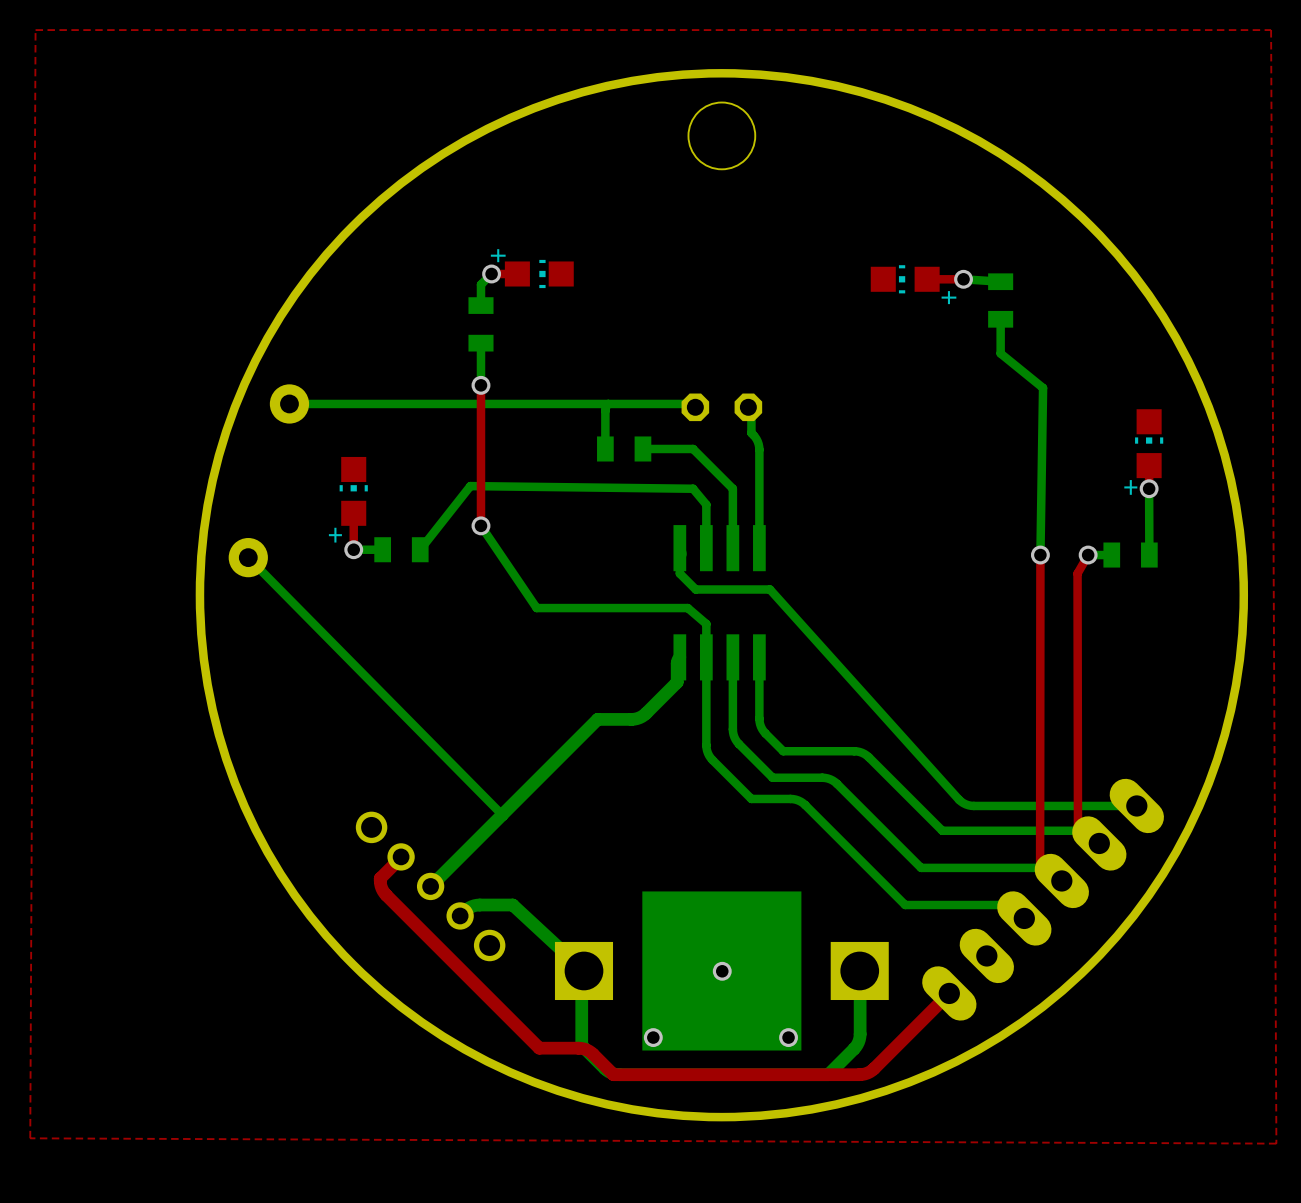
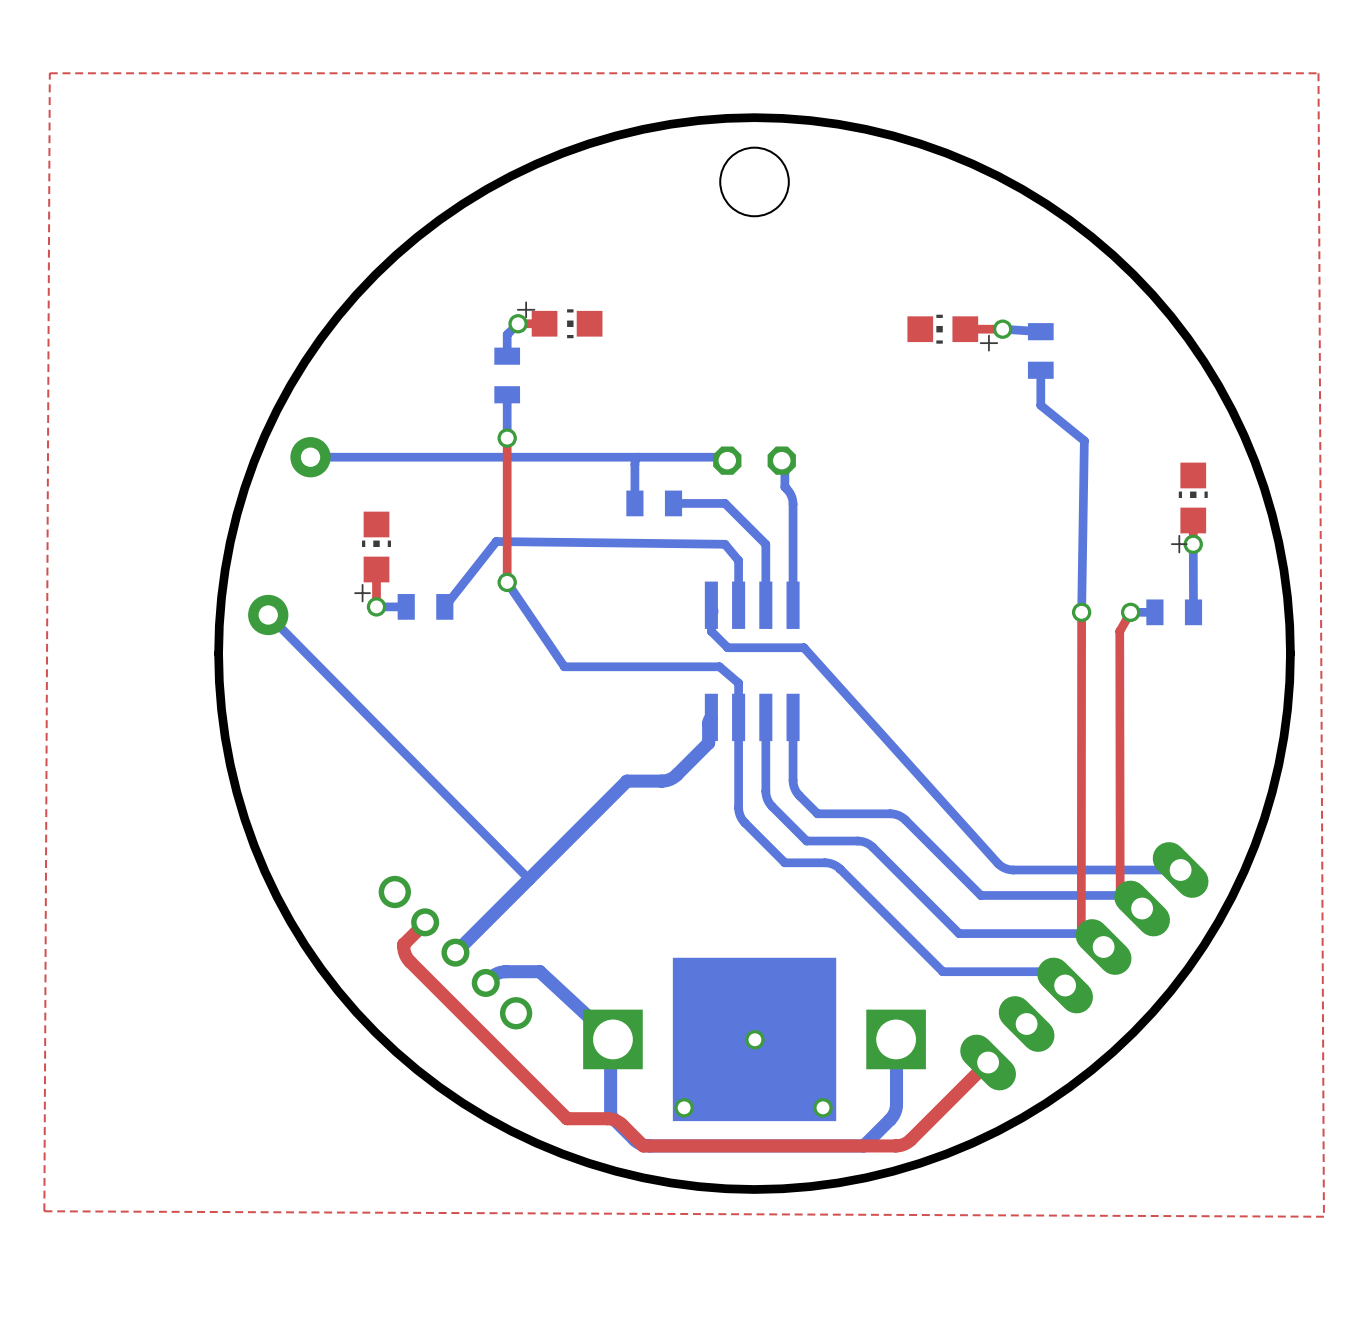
round board edge: [195, 69, 1249, 1122] -> none
board edge: none -> (218, 653) (221, 597) (230, 542) (254, 461) (277, 410) (305, 361) (338, 316) (375, 274) (417, 237) (462, 204) (511, 176) (562, 153) (643, 129) (698, 120) (754, 117) (810, 120) (865, 129) (946, 153) (997, 176) (1046, 204) (1091, 237) (1133, 274) (1171, 316) (1203, 361) (1232, 410) (1254, 461) (1278, 542) (1287, 597) (1290, 653) (1287, 709) (1278, 765) (1254, 845) (1232, 896) (1203, 945) (1171, 990) (1133, 1032) (1091, 1070) (1046, 1103) (997, 1131) (946, 1153) (865, 1177) (810, 1186) (754, 1189) (698, 1186) (643, 1177) (562, 1153) (511, 1131) (462, 1103) (417, 1070) (375, 1032) (338, 990) (305, 945) (277, 896) (254, 845) (230, 765) (221, 709) (218, 653)

